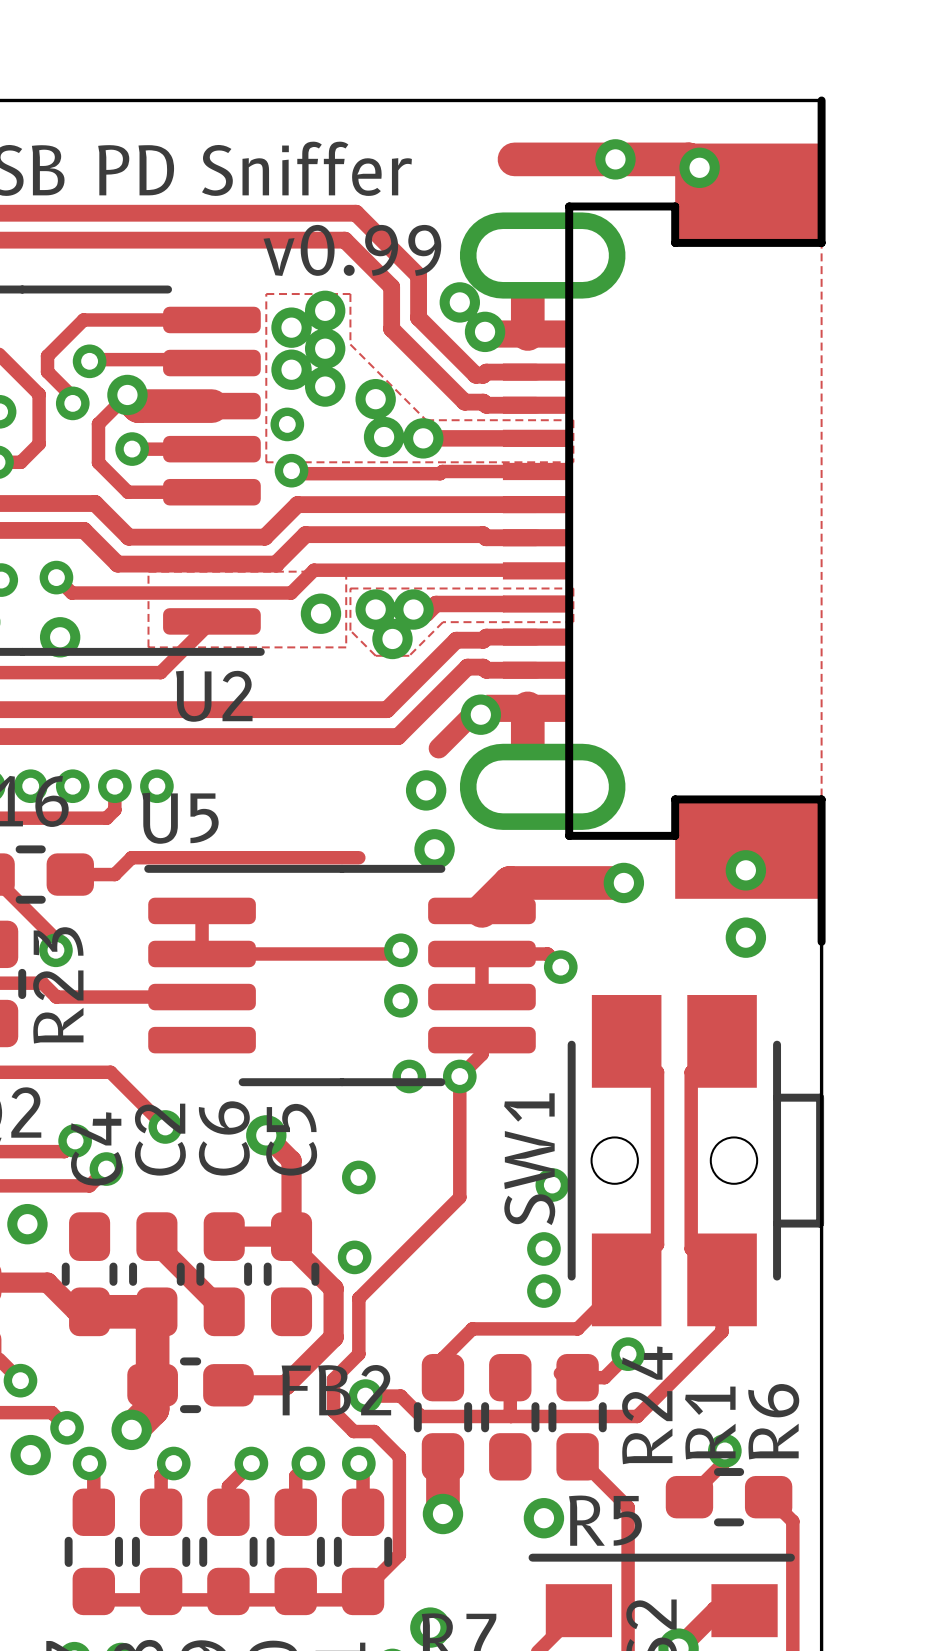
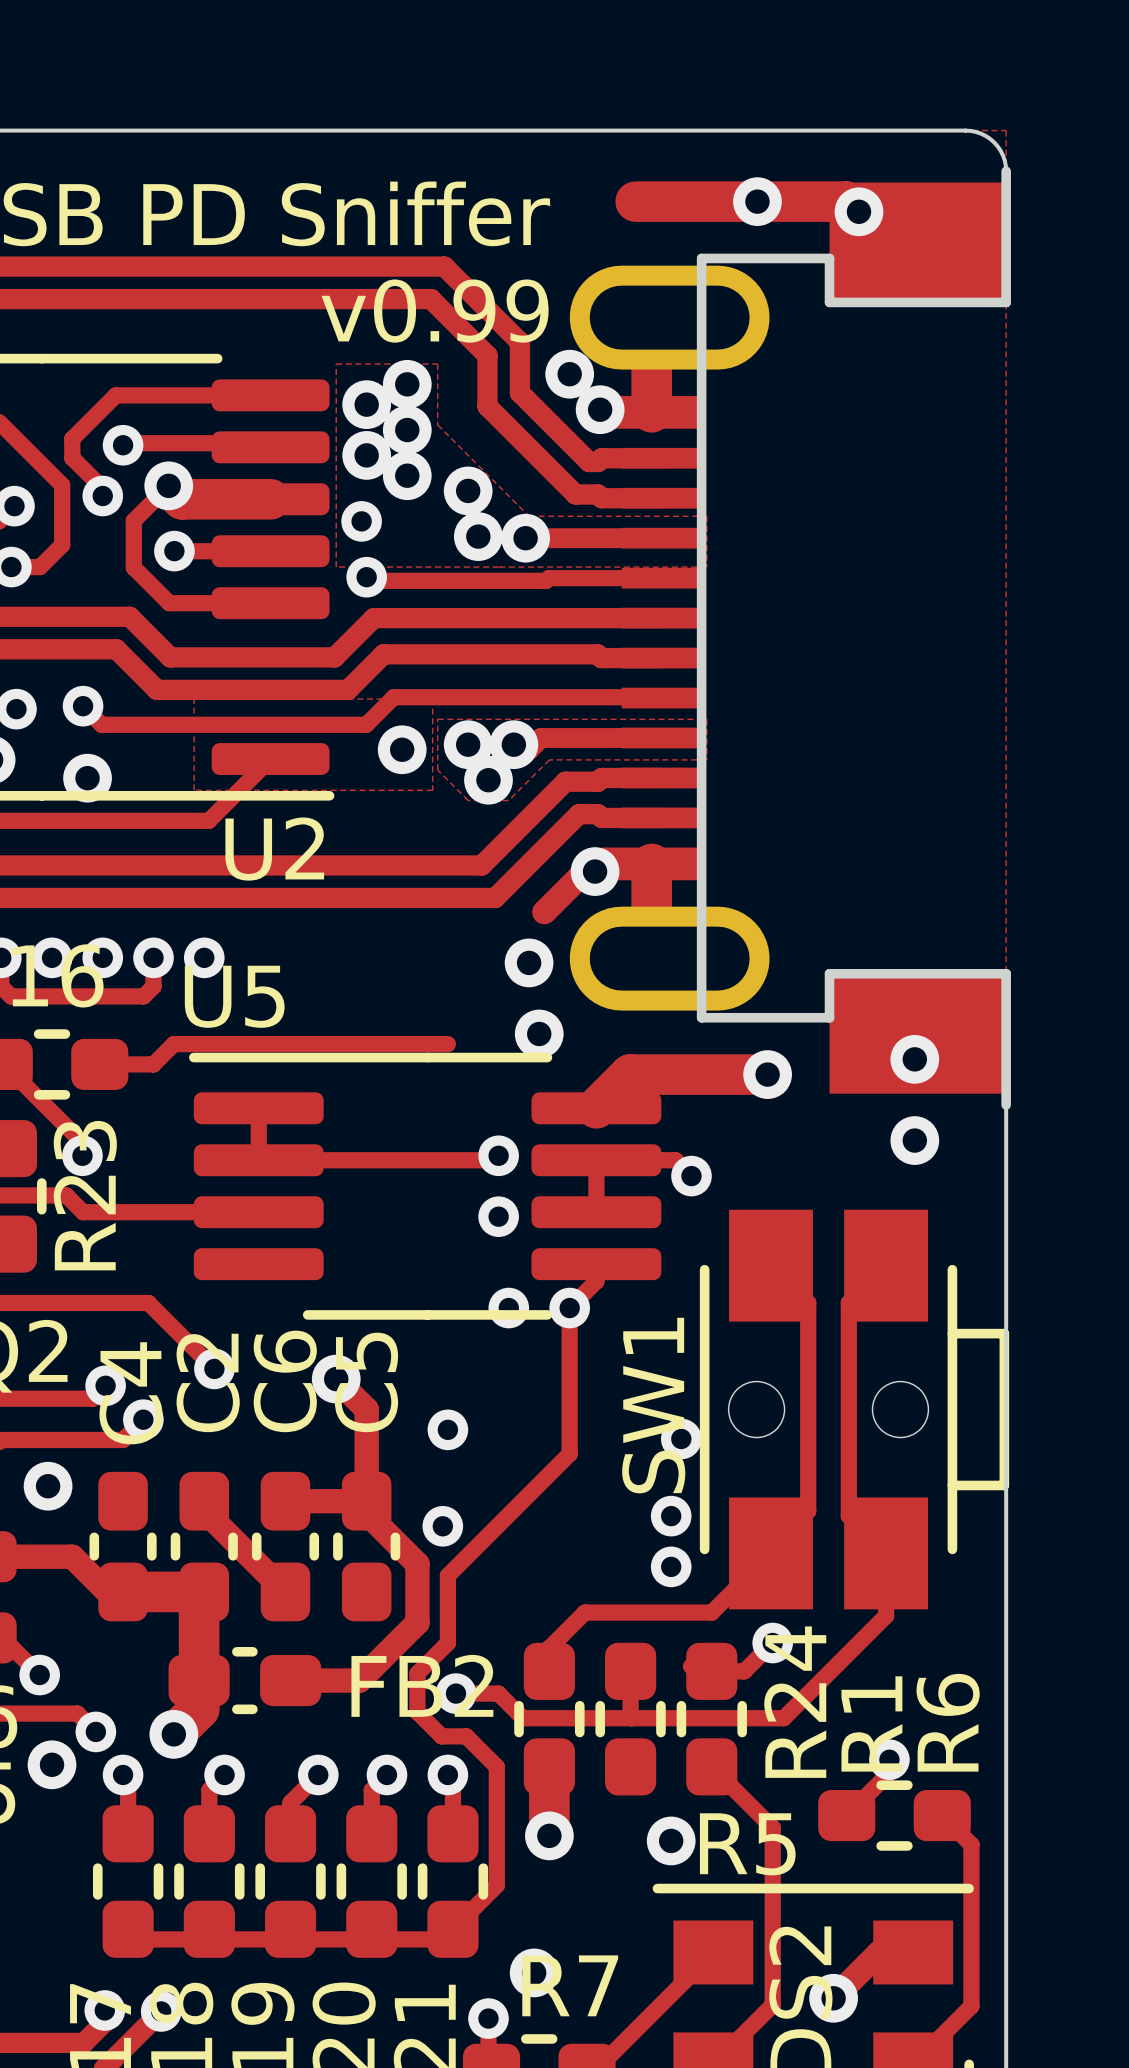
part footprint: [459, 96, 826, 946] -> [569, 166, 1011, 1110]
board edge: (787, 100) (821, 100) -> (965, 130) (981, 133) (994, 142) (1003, 155) (1006, 171)
board edge: none -> (1006, 1105) (1006, 1145)

